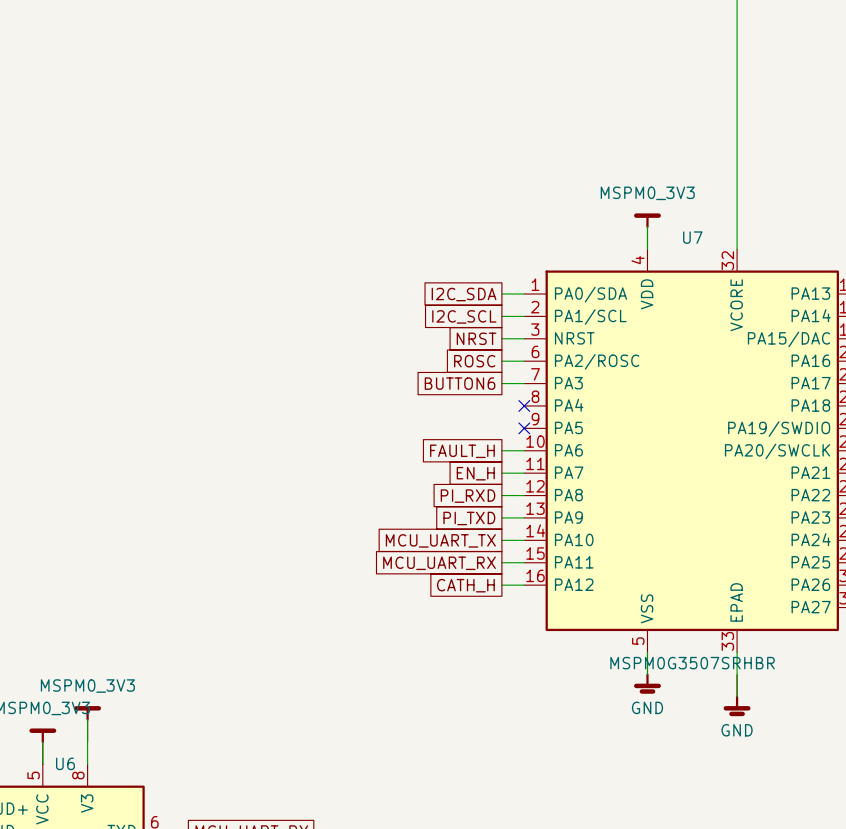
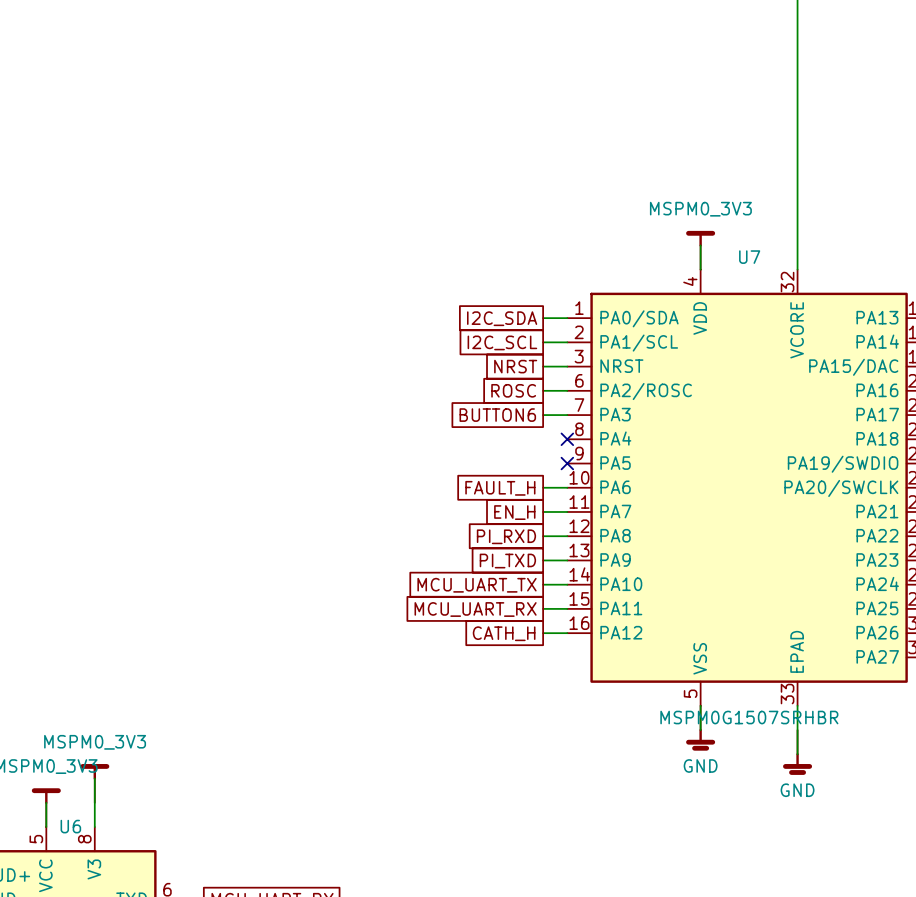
U7 value: MSPM0G3507SRHBR (692, 663) -> MSPM0G1507SRHBR (749, 717)

